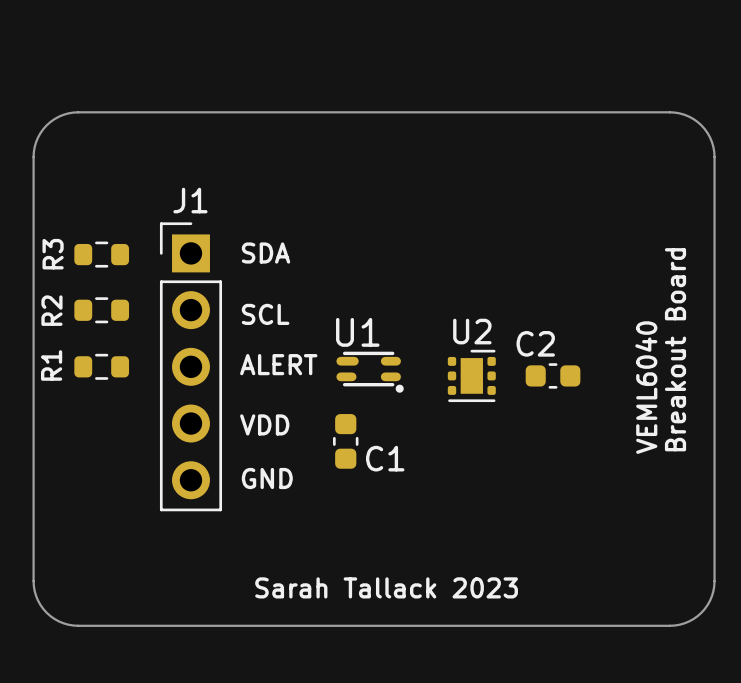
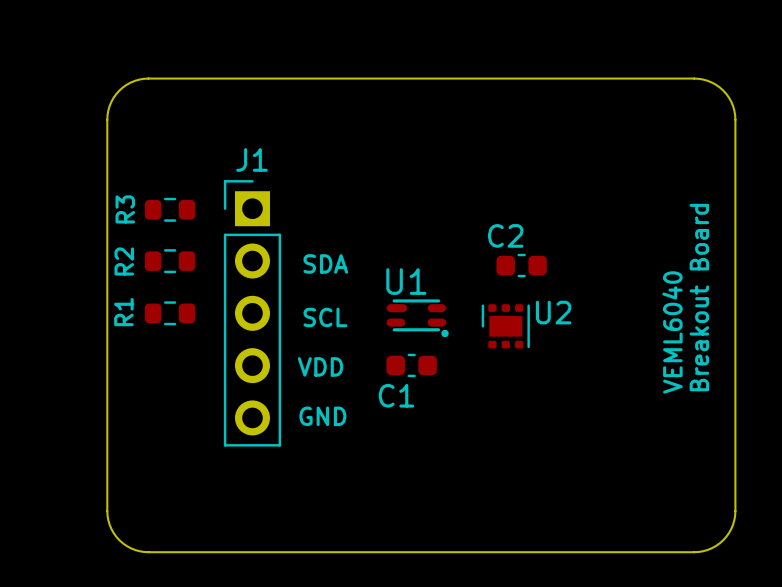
text: SDA (266, 253) -> none
text: SCL (265, 314) -> SDA (325, 263)
U2 name position: U2 (472, 331) -> U2 (553, 312)
text: ALERT (278, 364) -> SCL (325, 317)
U2 rotation: 0° (471, 375) -> 90° counterclockwise (505, 326)
C2 position: (553, 375) -> (521, 265)
C1 rotation: 0° (345, 441) -> 90° clockwise (411, 365)
text: Sarah Tallack 2023 (386, 587) -> none

